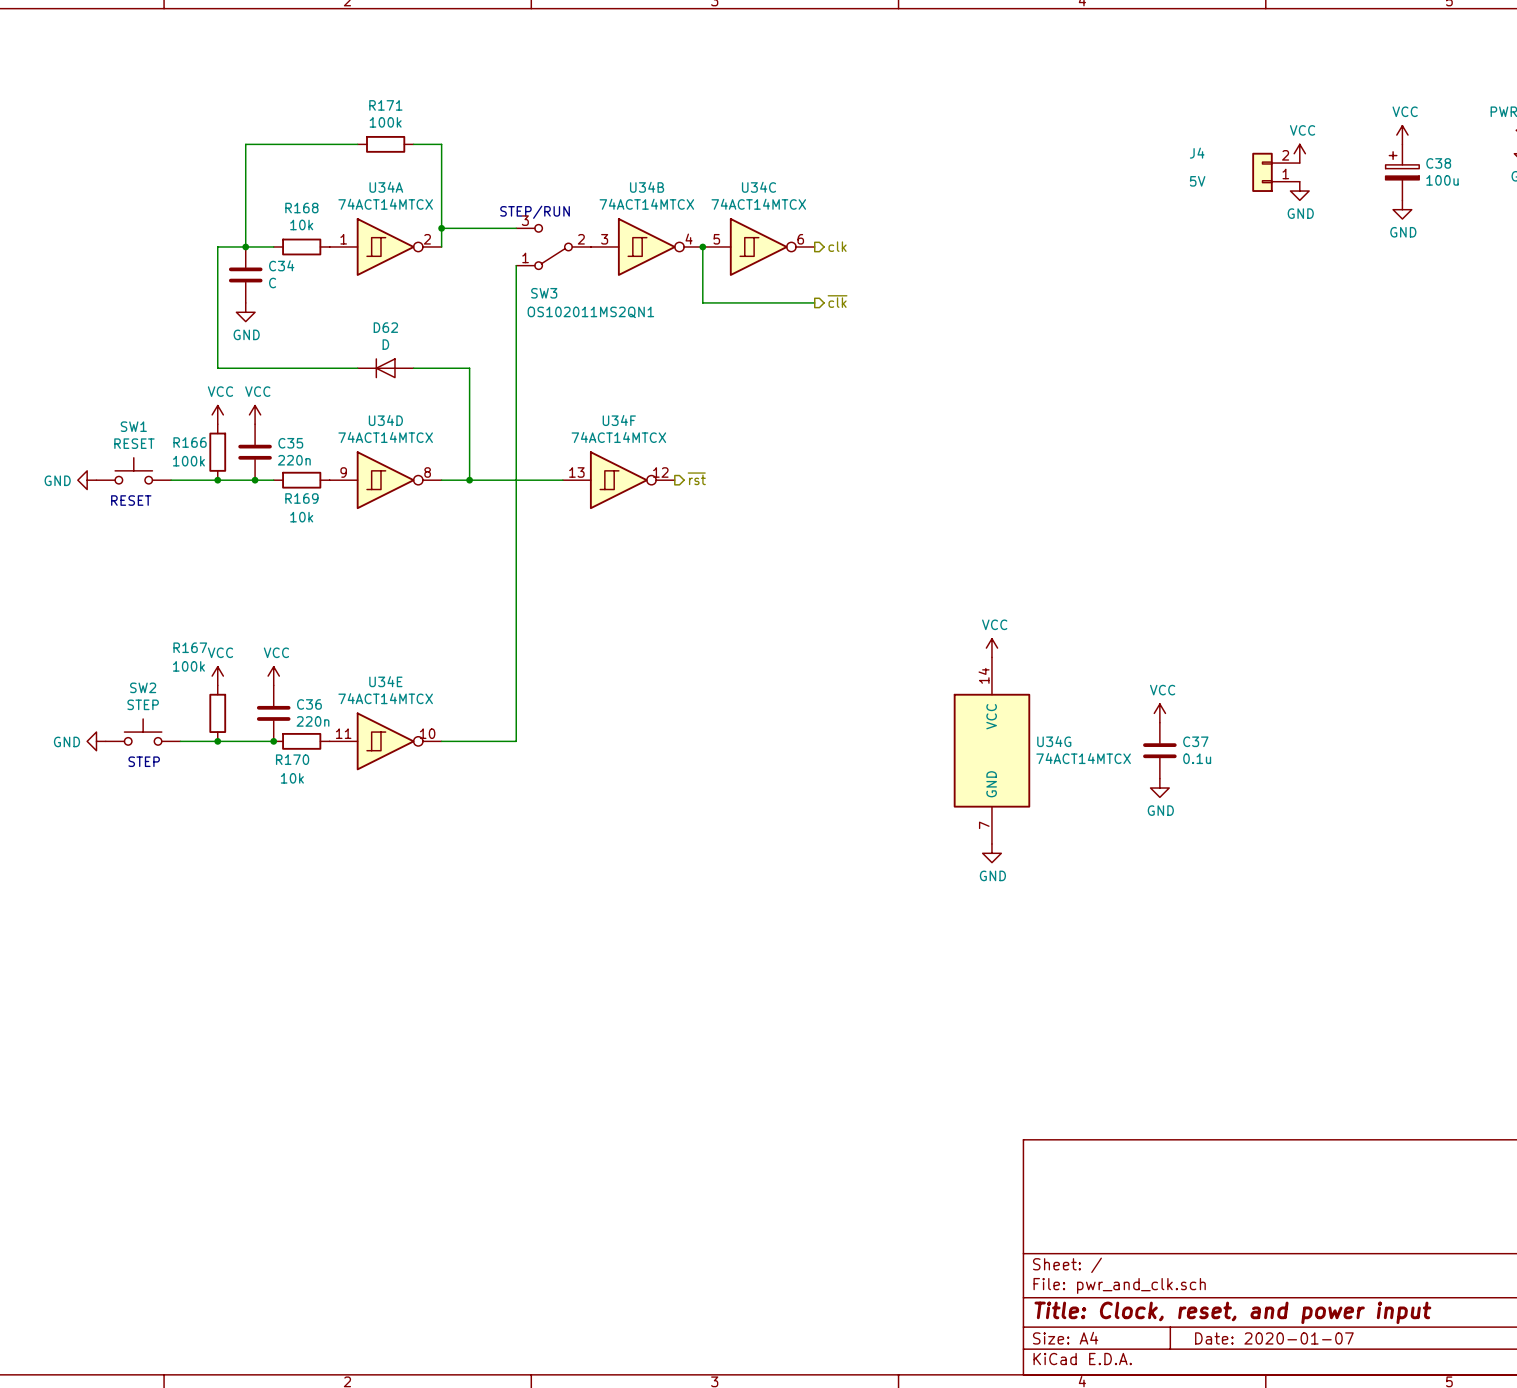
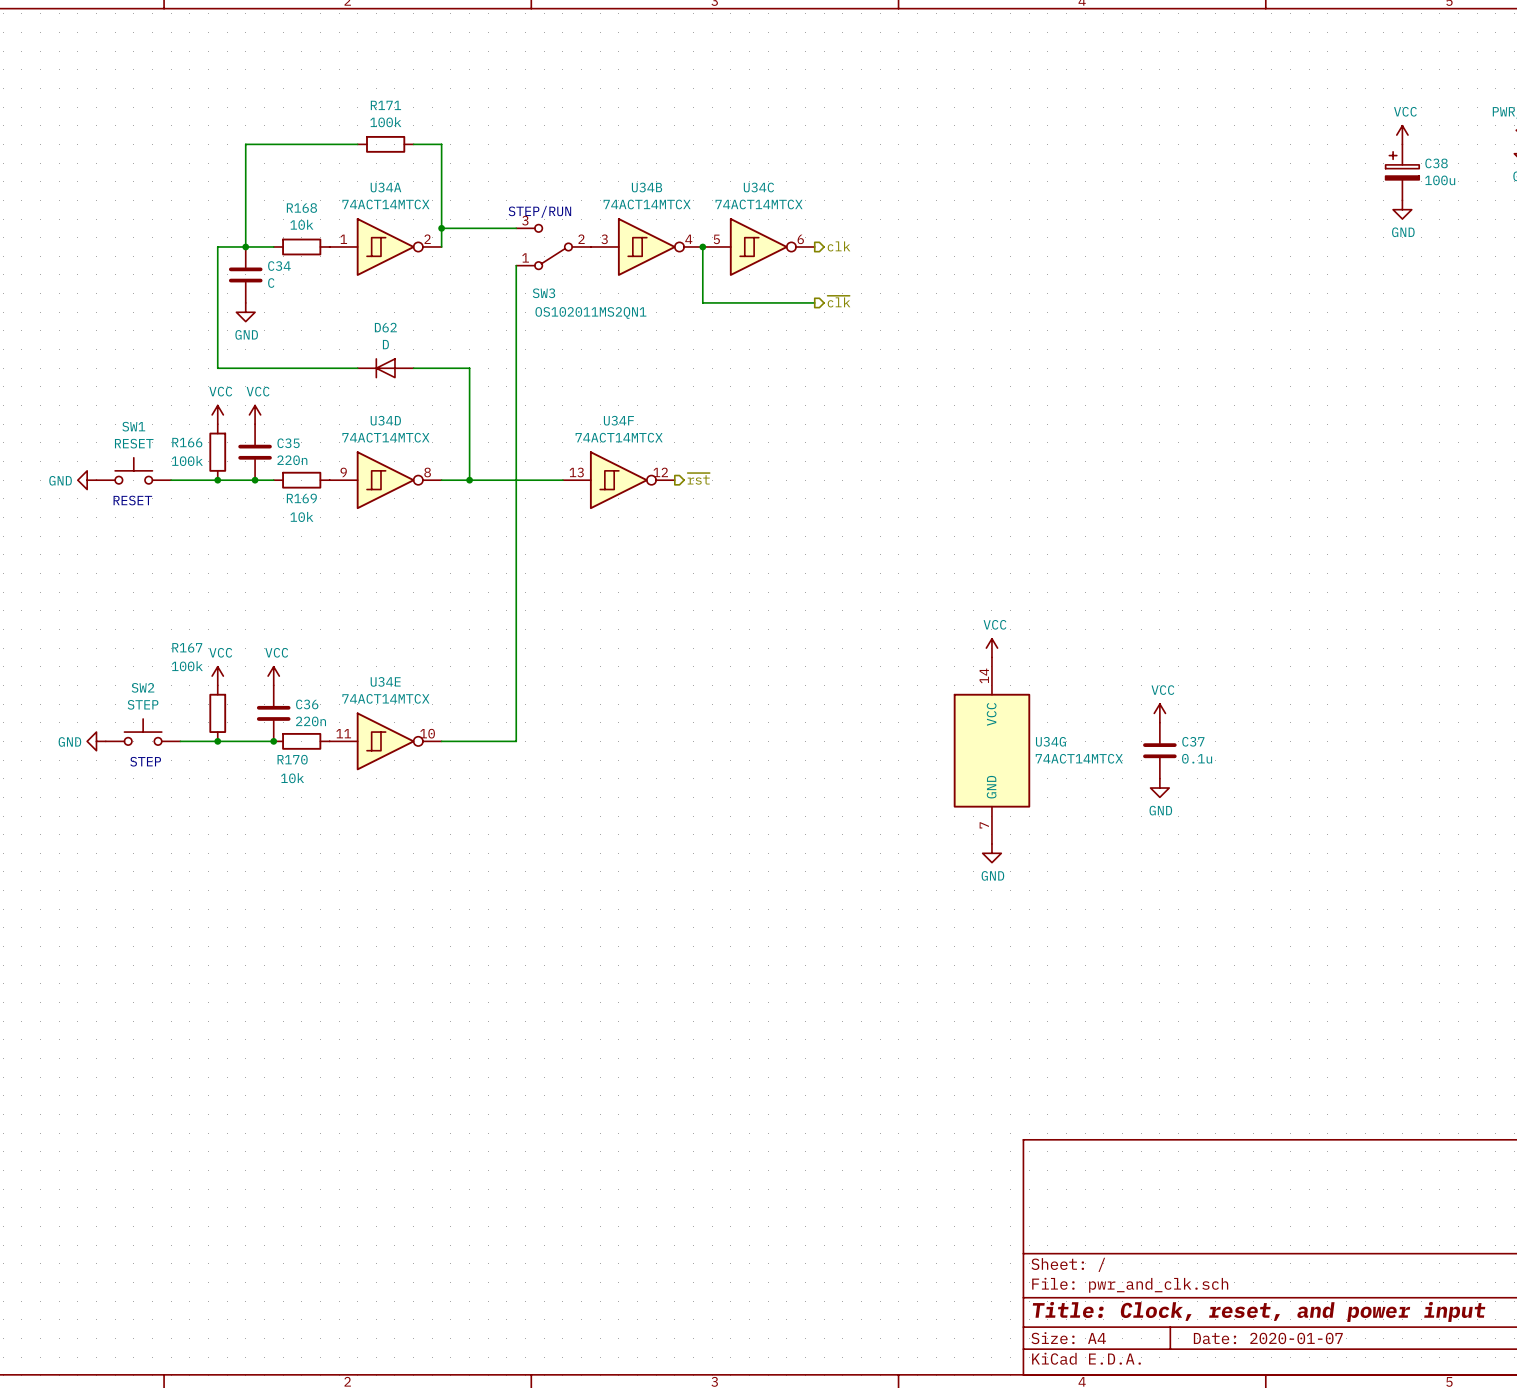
power symbol: VCC (1299, 153) -> none
J4: 5V (1276, 172) -> none
power symbol: GND (1299, 191) -> none

